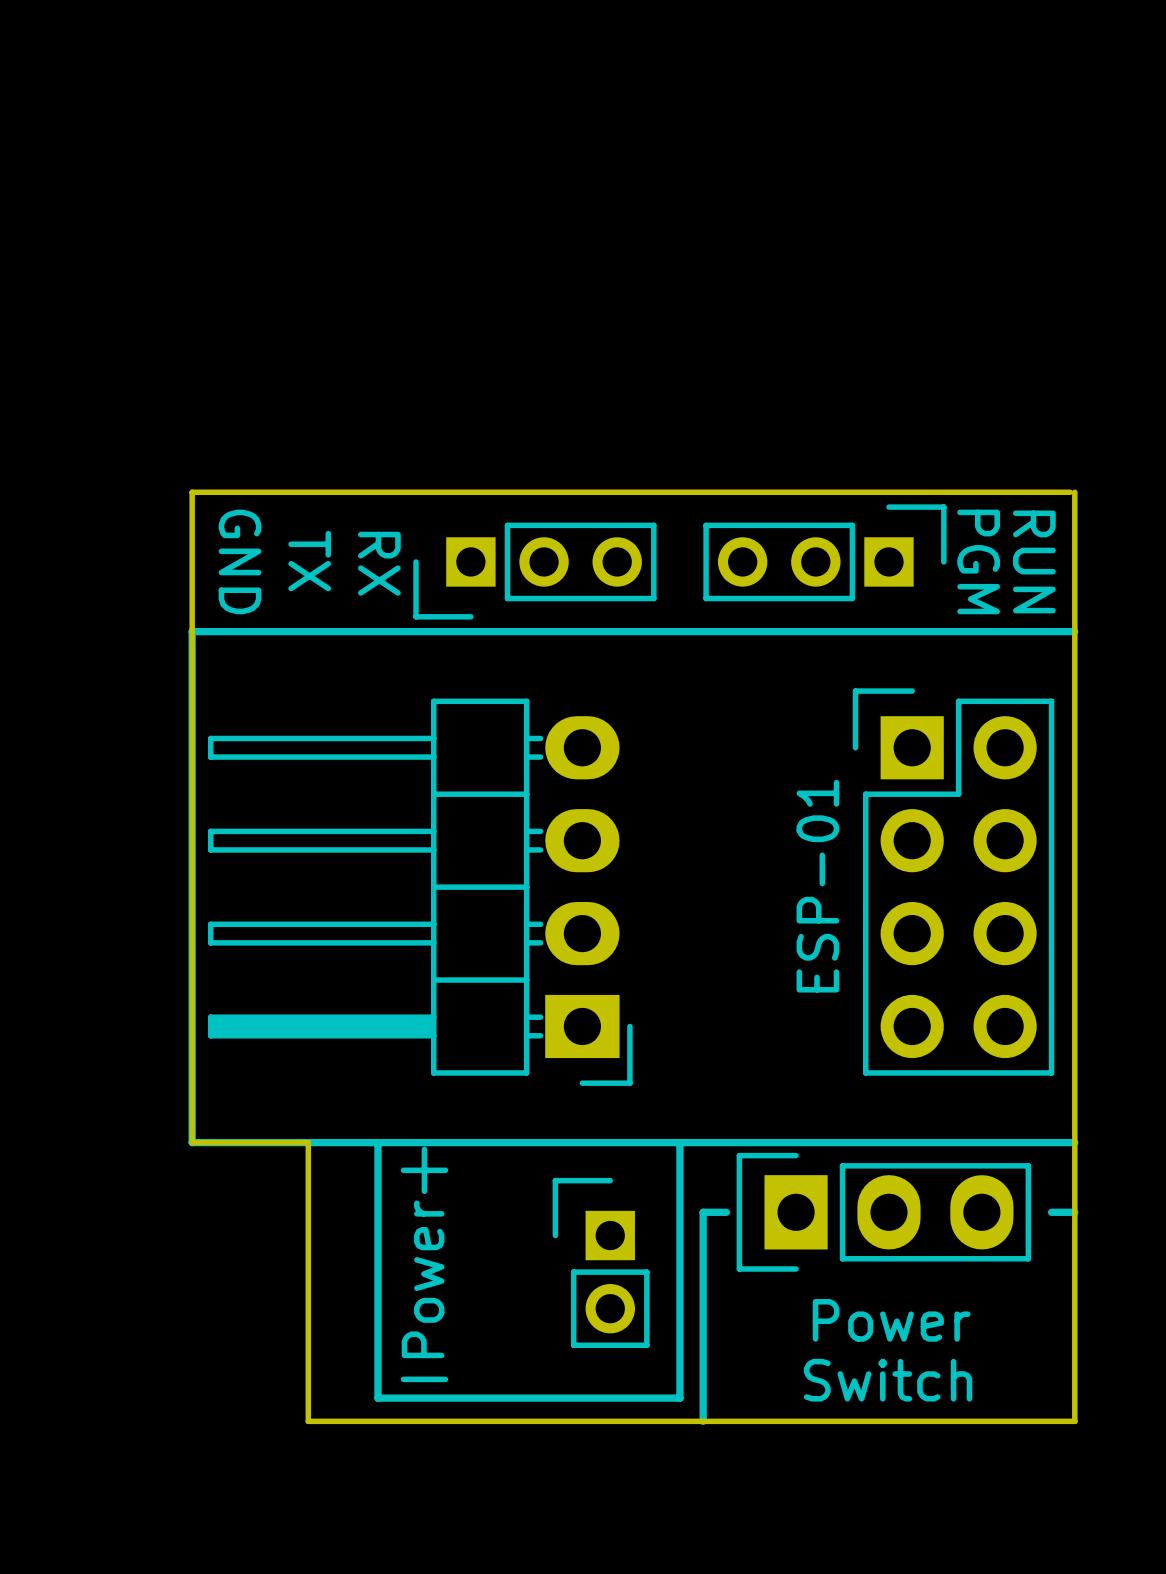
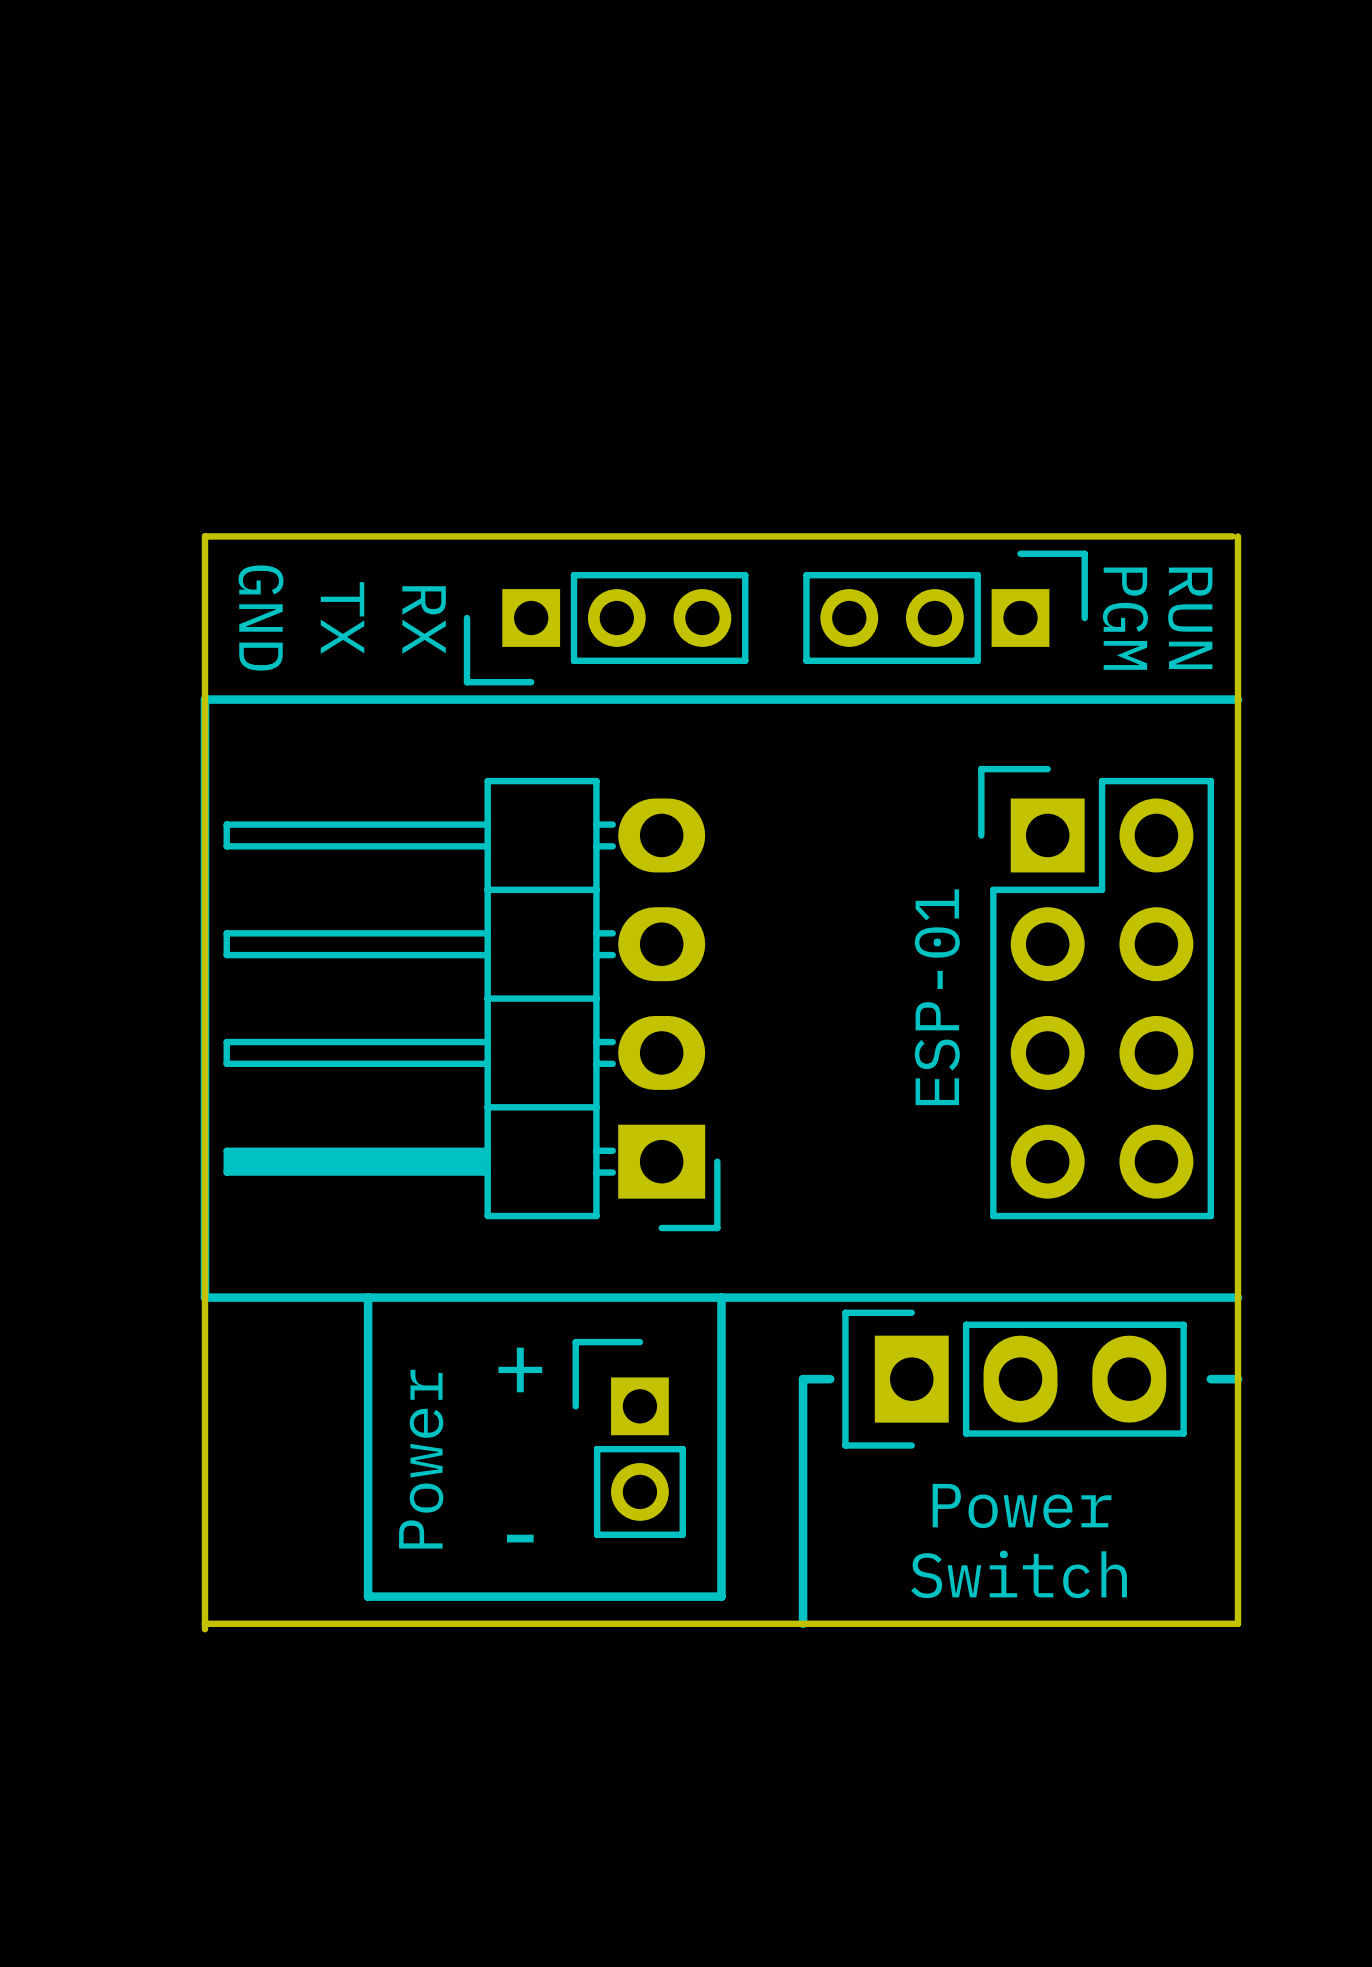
board edge: (192, 1142) (308, 1142) (308, 1421) -> (204, 1297) (204, 1629)
line: (377, 1142) (377, 1398) -> (368, 1297) (368, 1596) (422, 1596)
line: (679, 1142) (679, 1398) (633, 1398) -> (721, 1297) (721, 1596)
text position: + (424, 1170) -> + (520, 1369)
part position: (601, 1262) -> (629, 1438)
text position: Power (423, 1279) -> Power (421, 1459)
text position: - (424, 1379) -> - (520, 1538)
board edge: none -> (204, 1623) (340, 1623)

